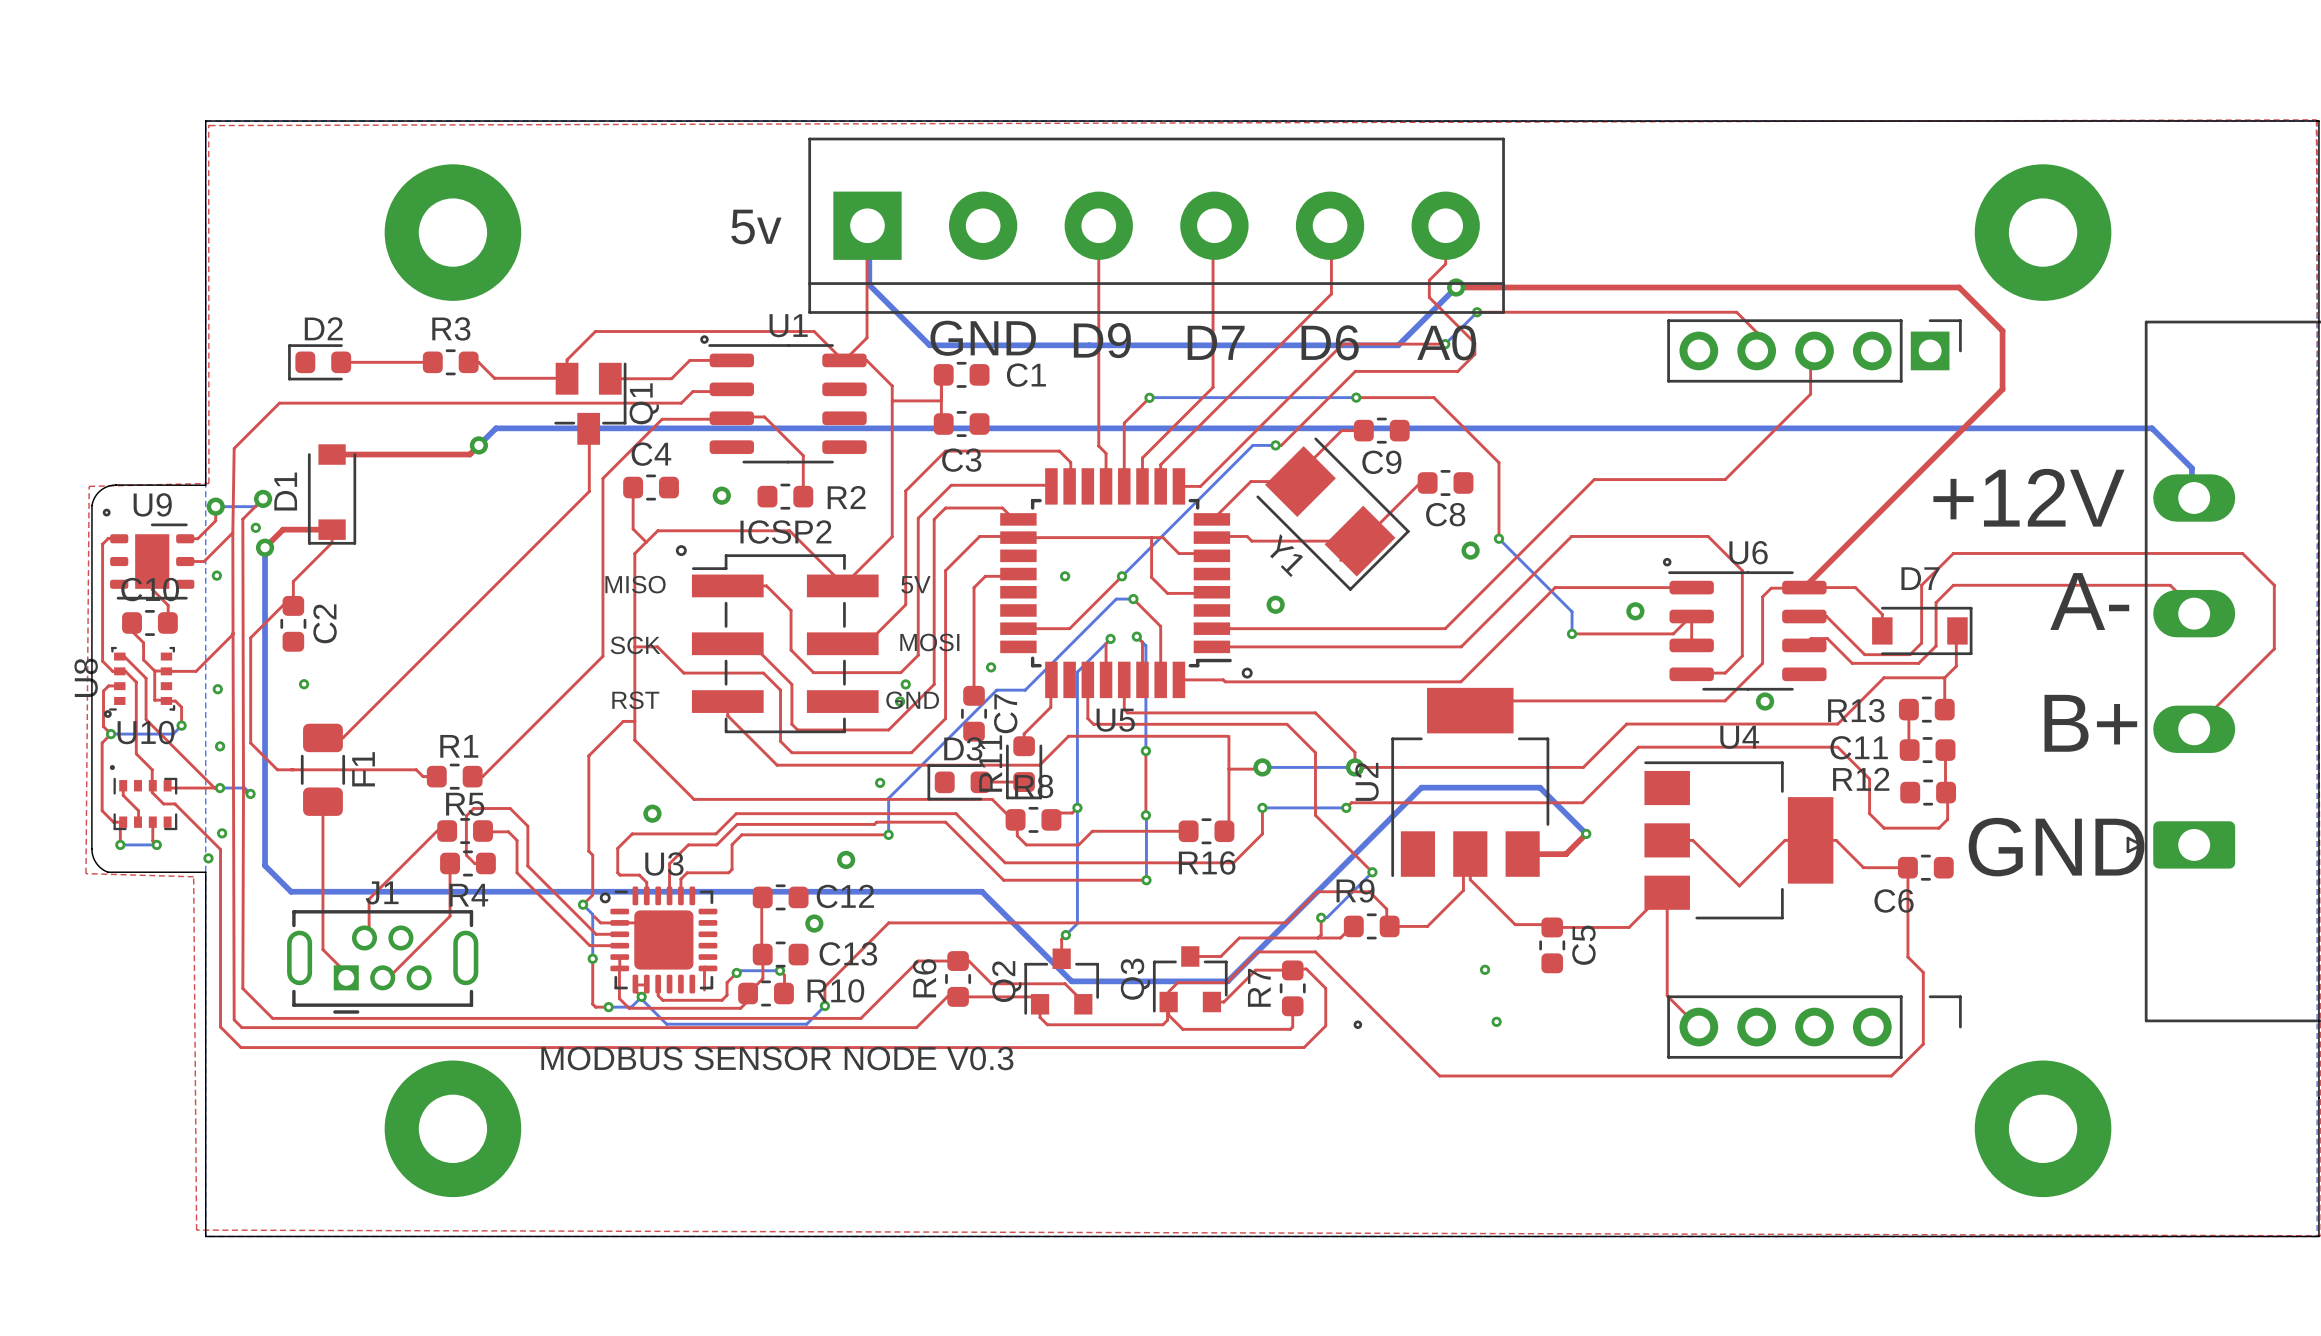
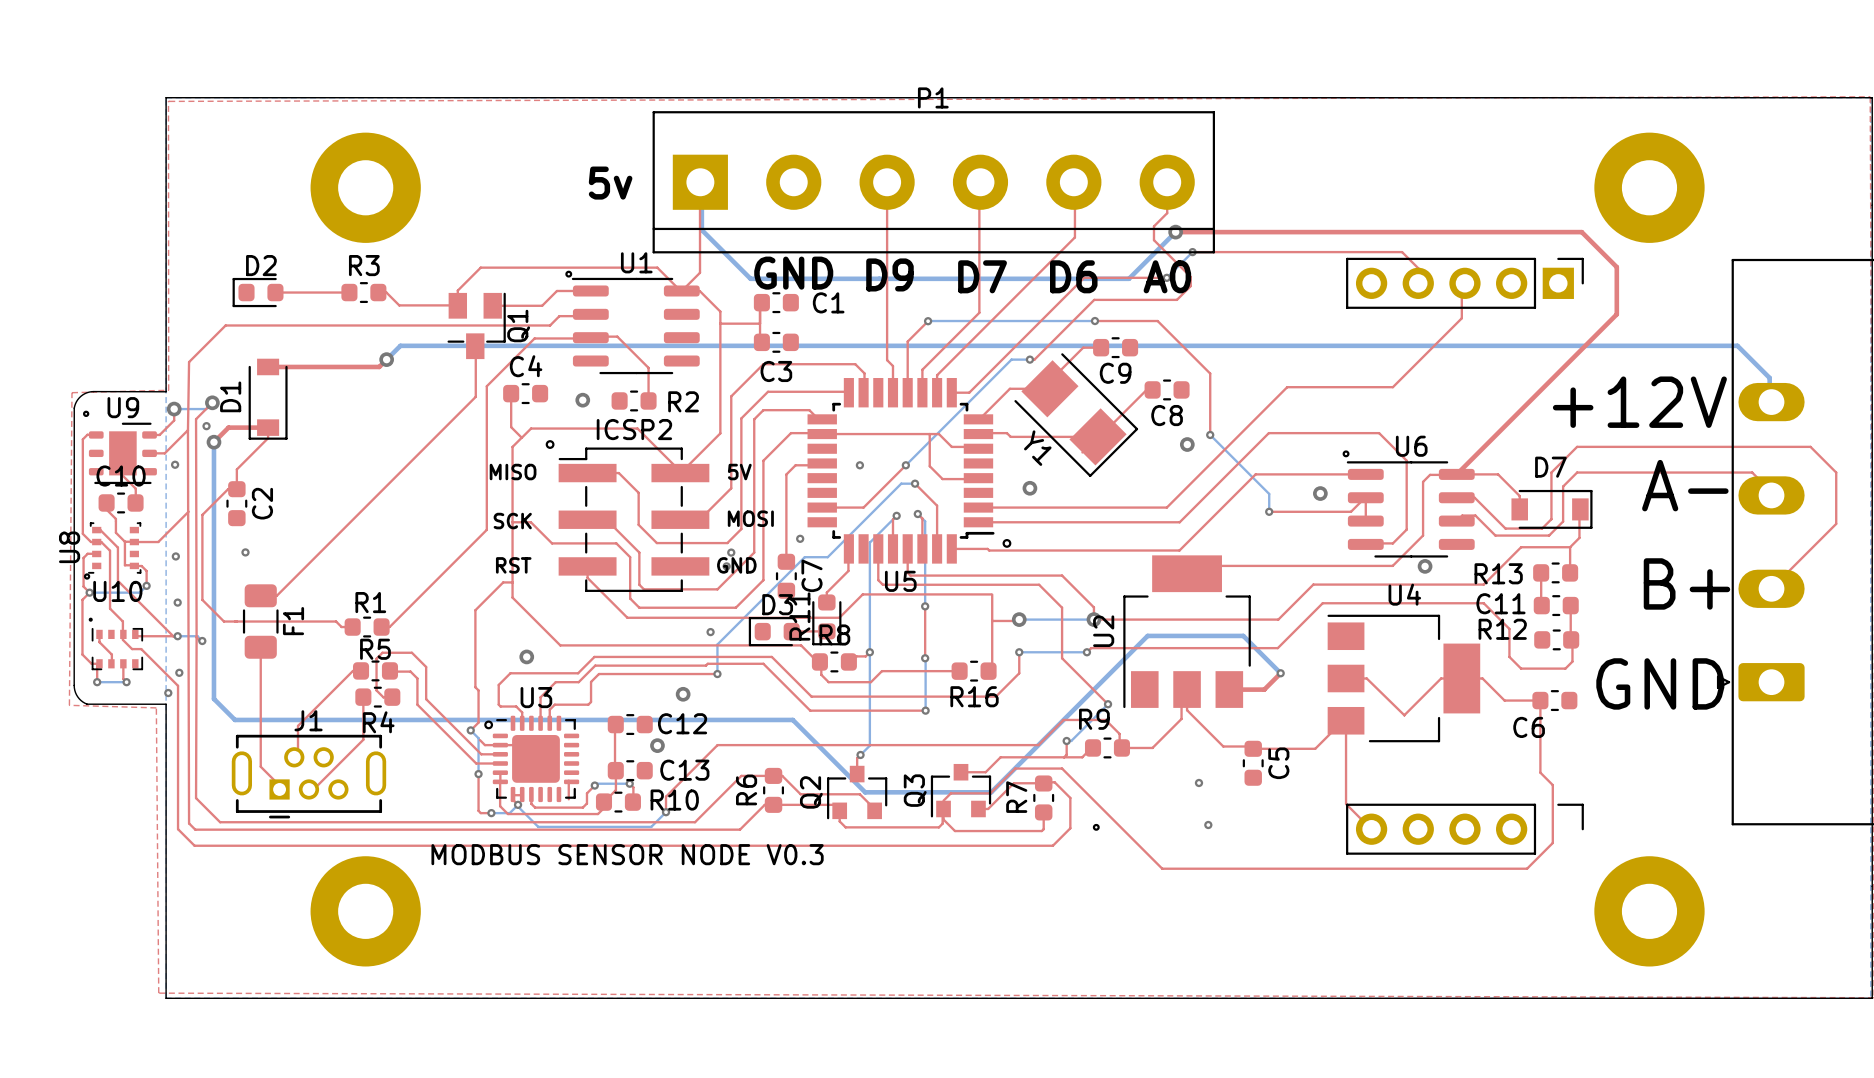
P1 name: none -> P1 (933, 97)

